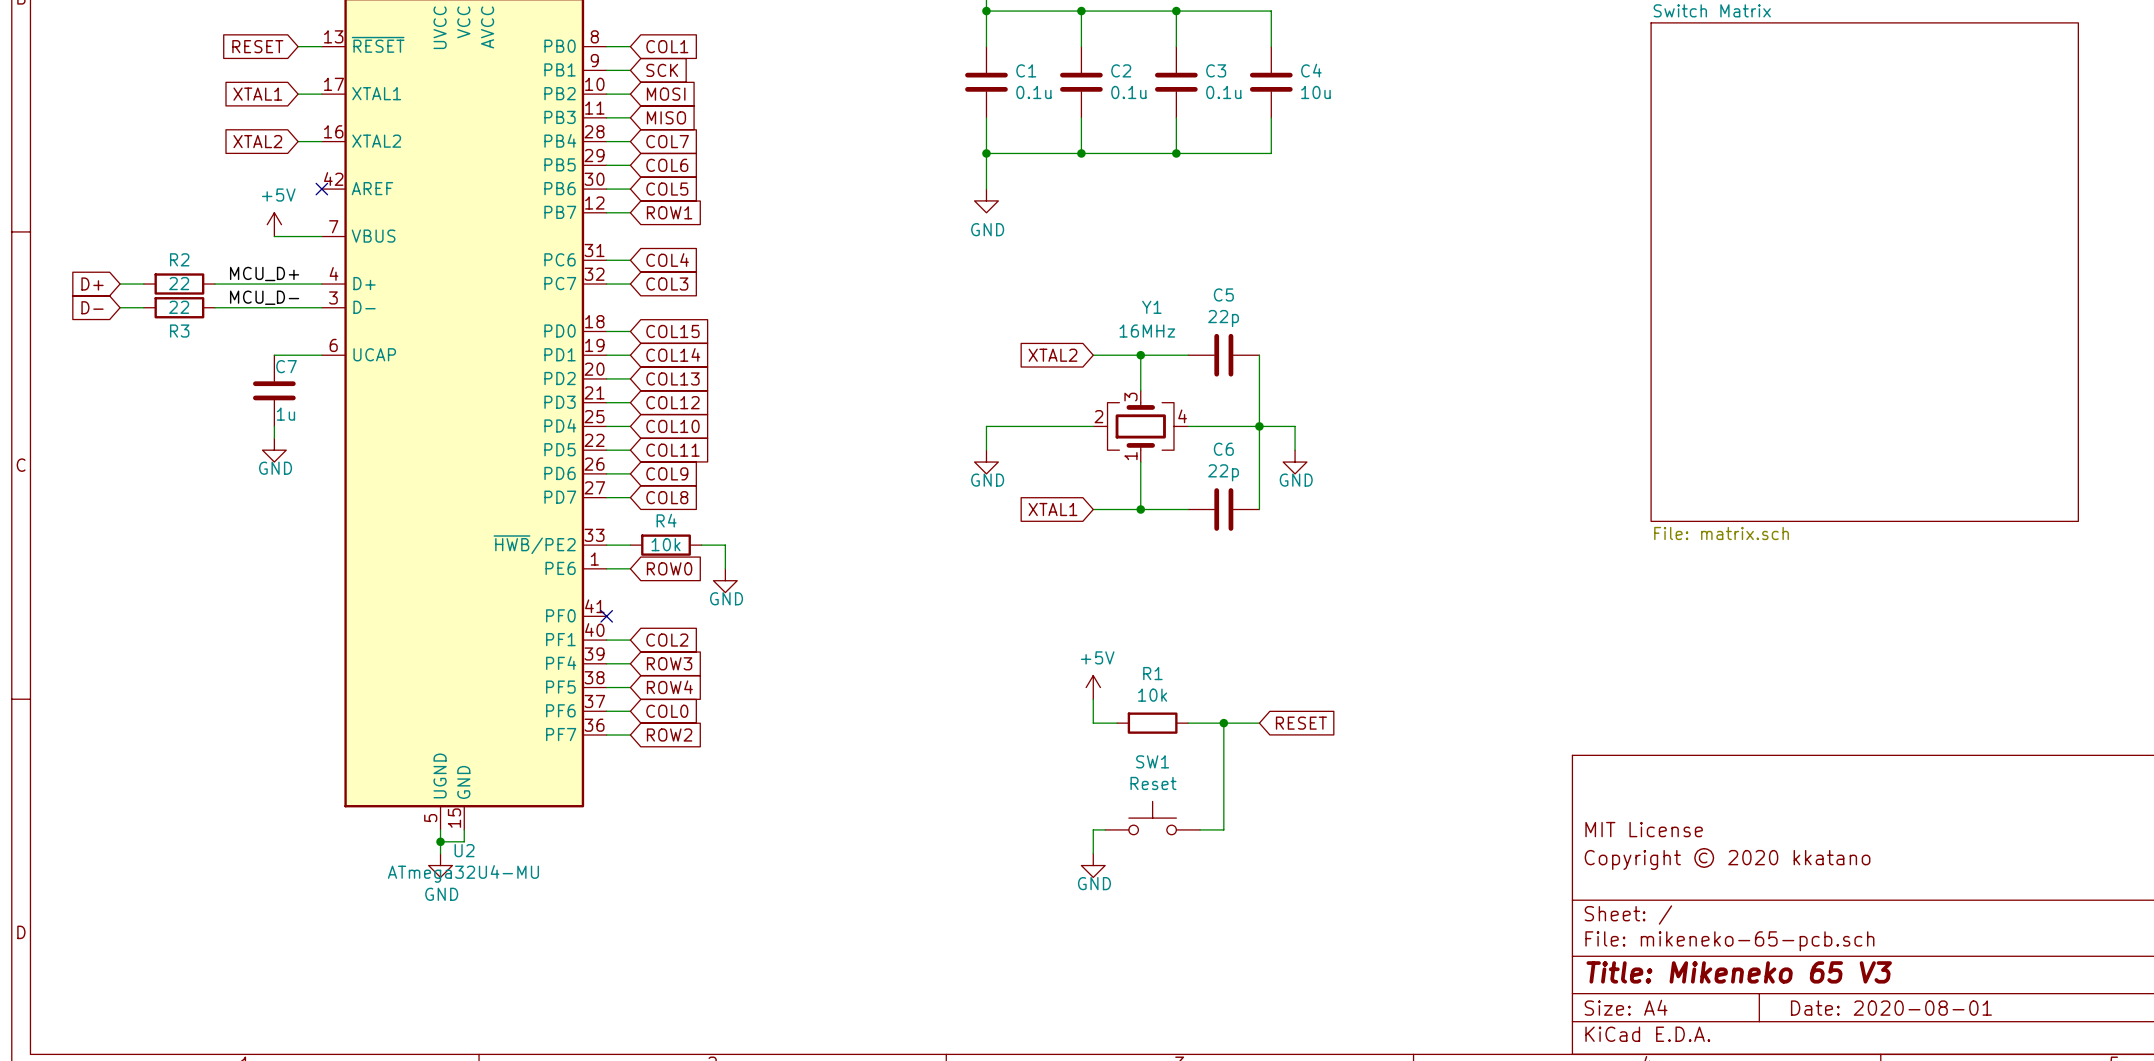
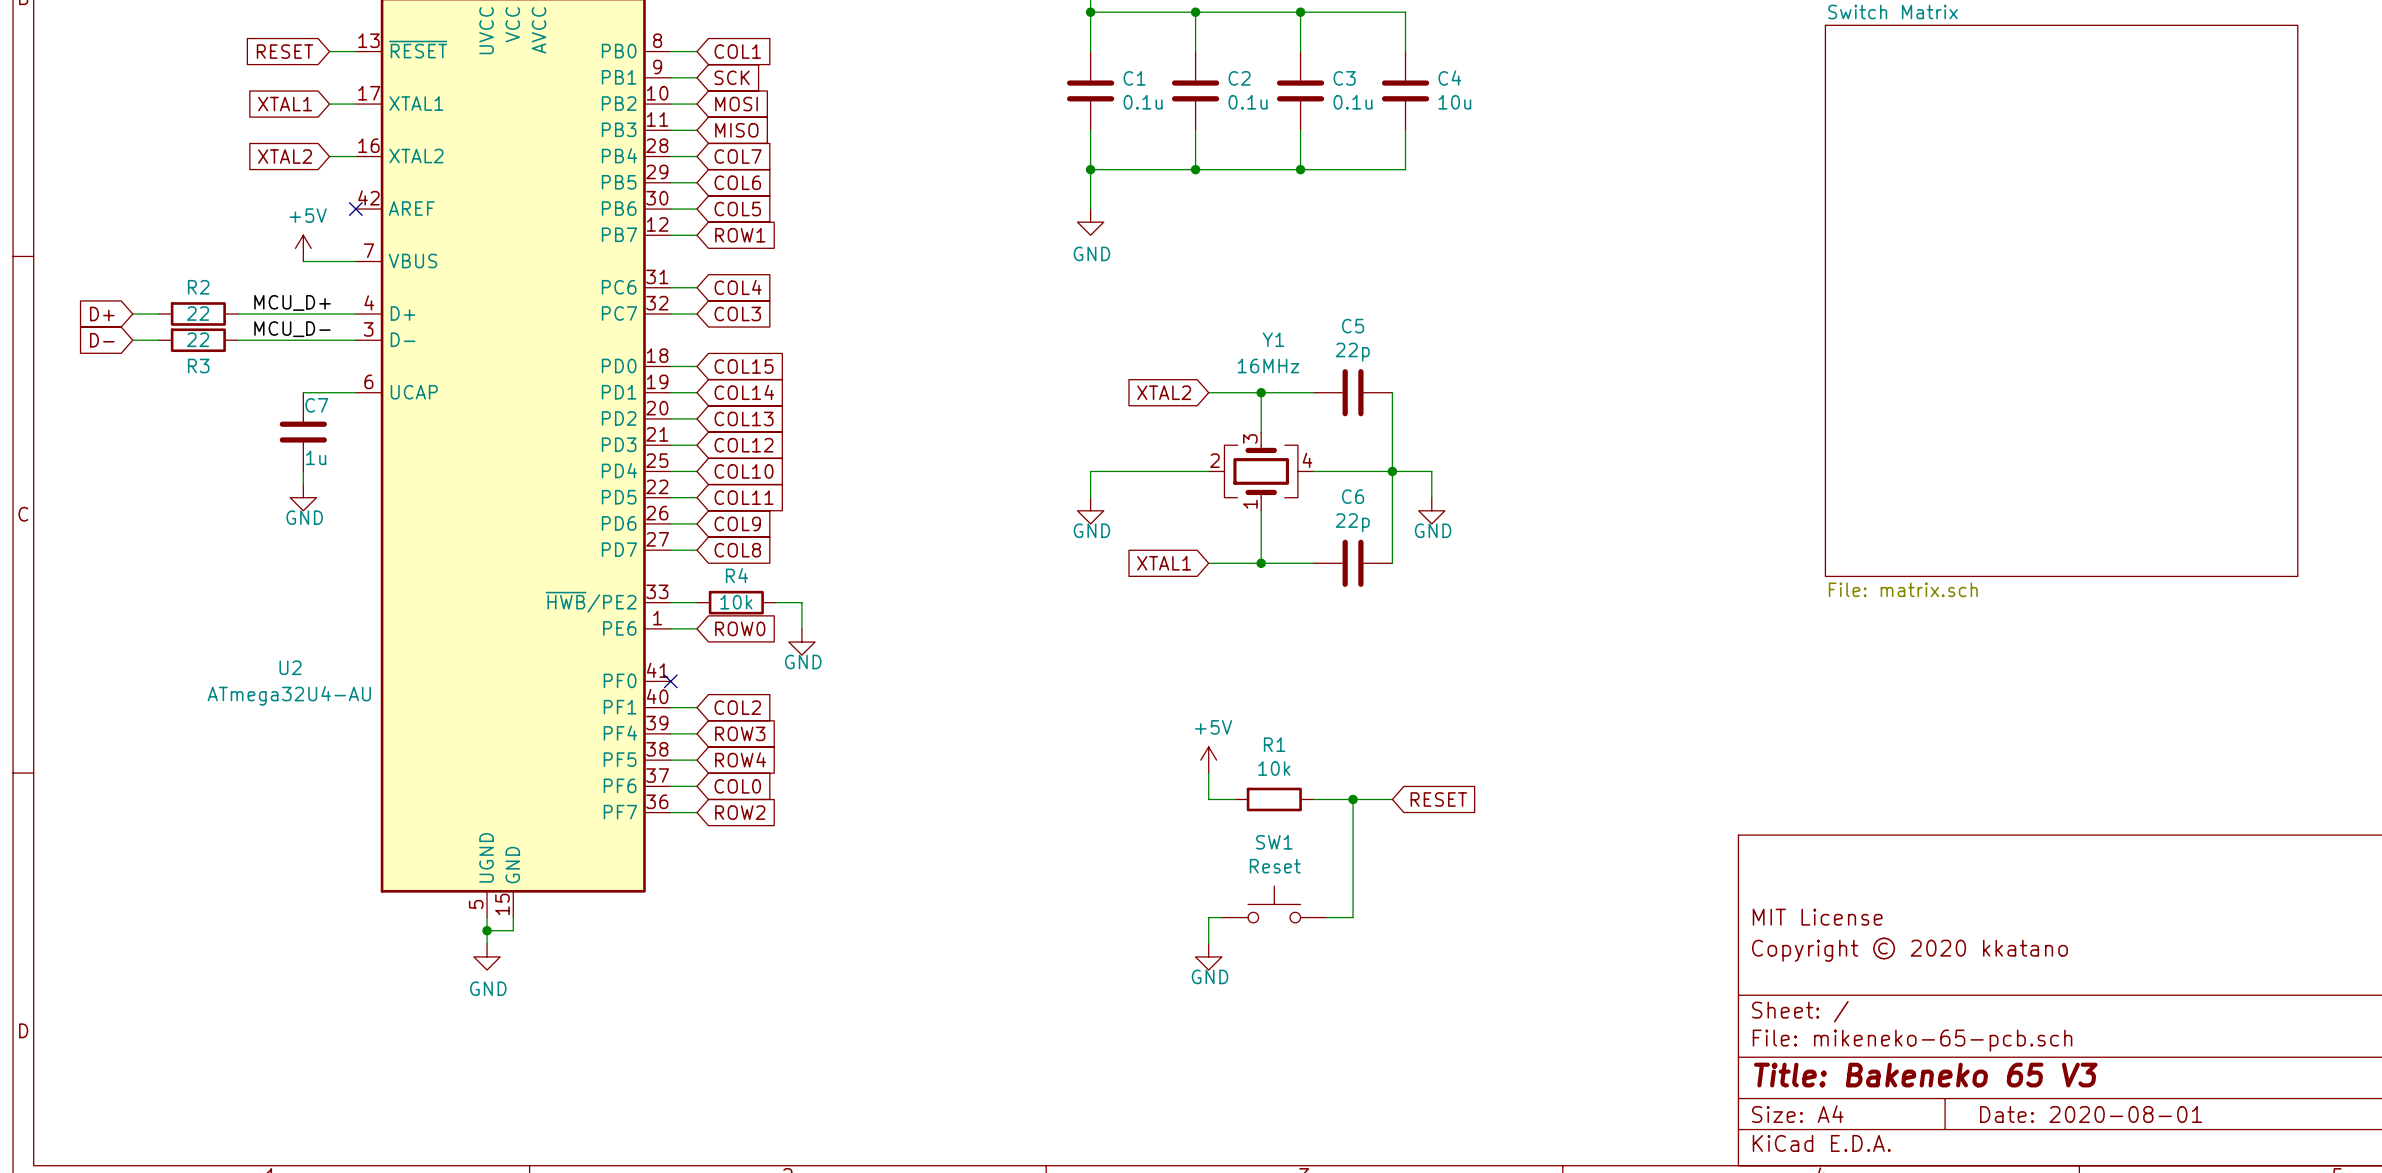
U2 name position: U2 (464, 850) -> U2 (290, 667)
U2 value: ATmega32U4-MU (463, 873) -> ATmega32U4-AU (289, 695)
title block: Title: Mikeneko 65 V3 (1739, 972) -> Title: Bakeneko 65 V3 (1925, 1075)

